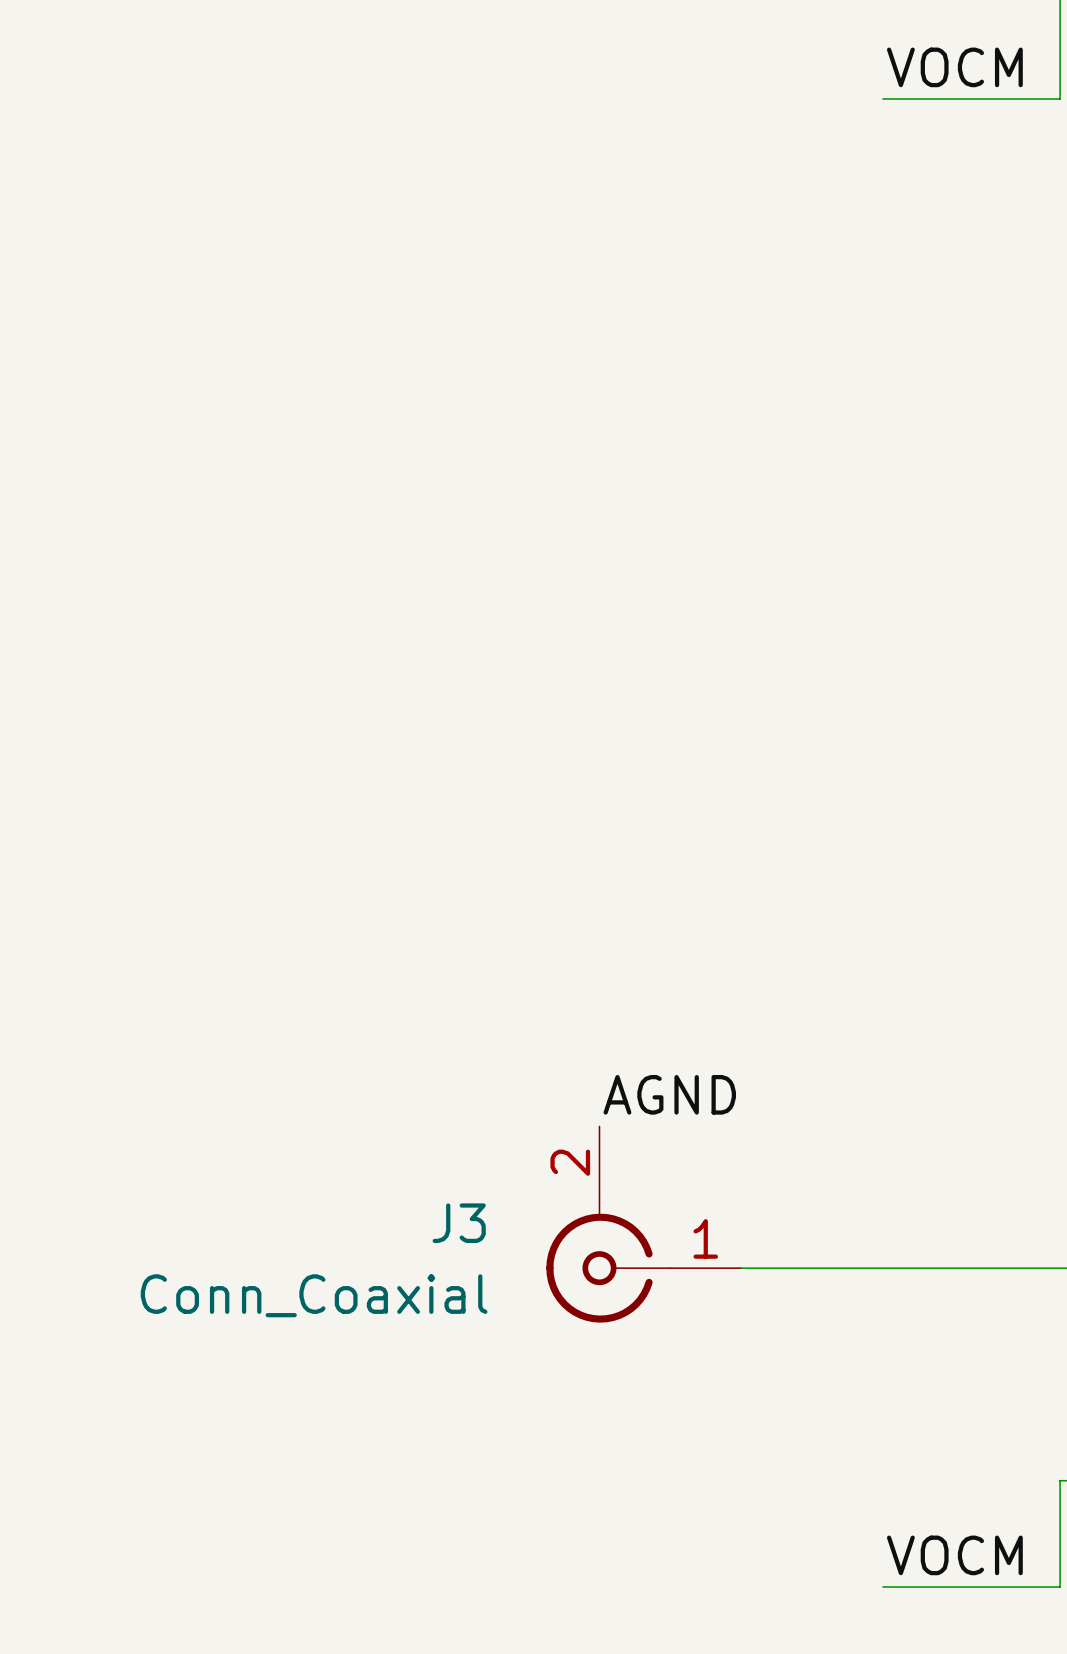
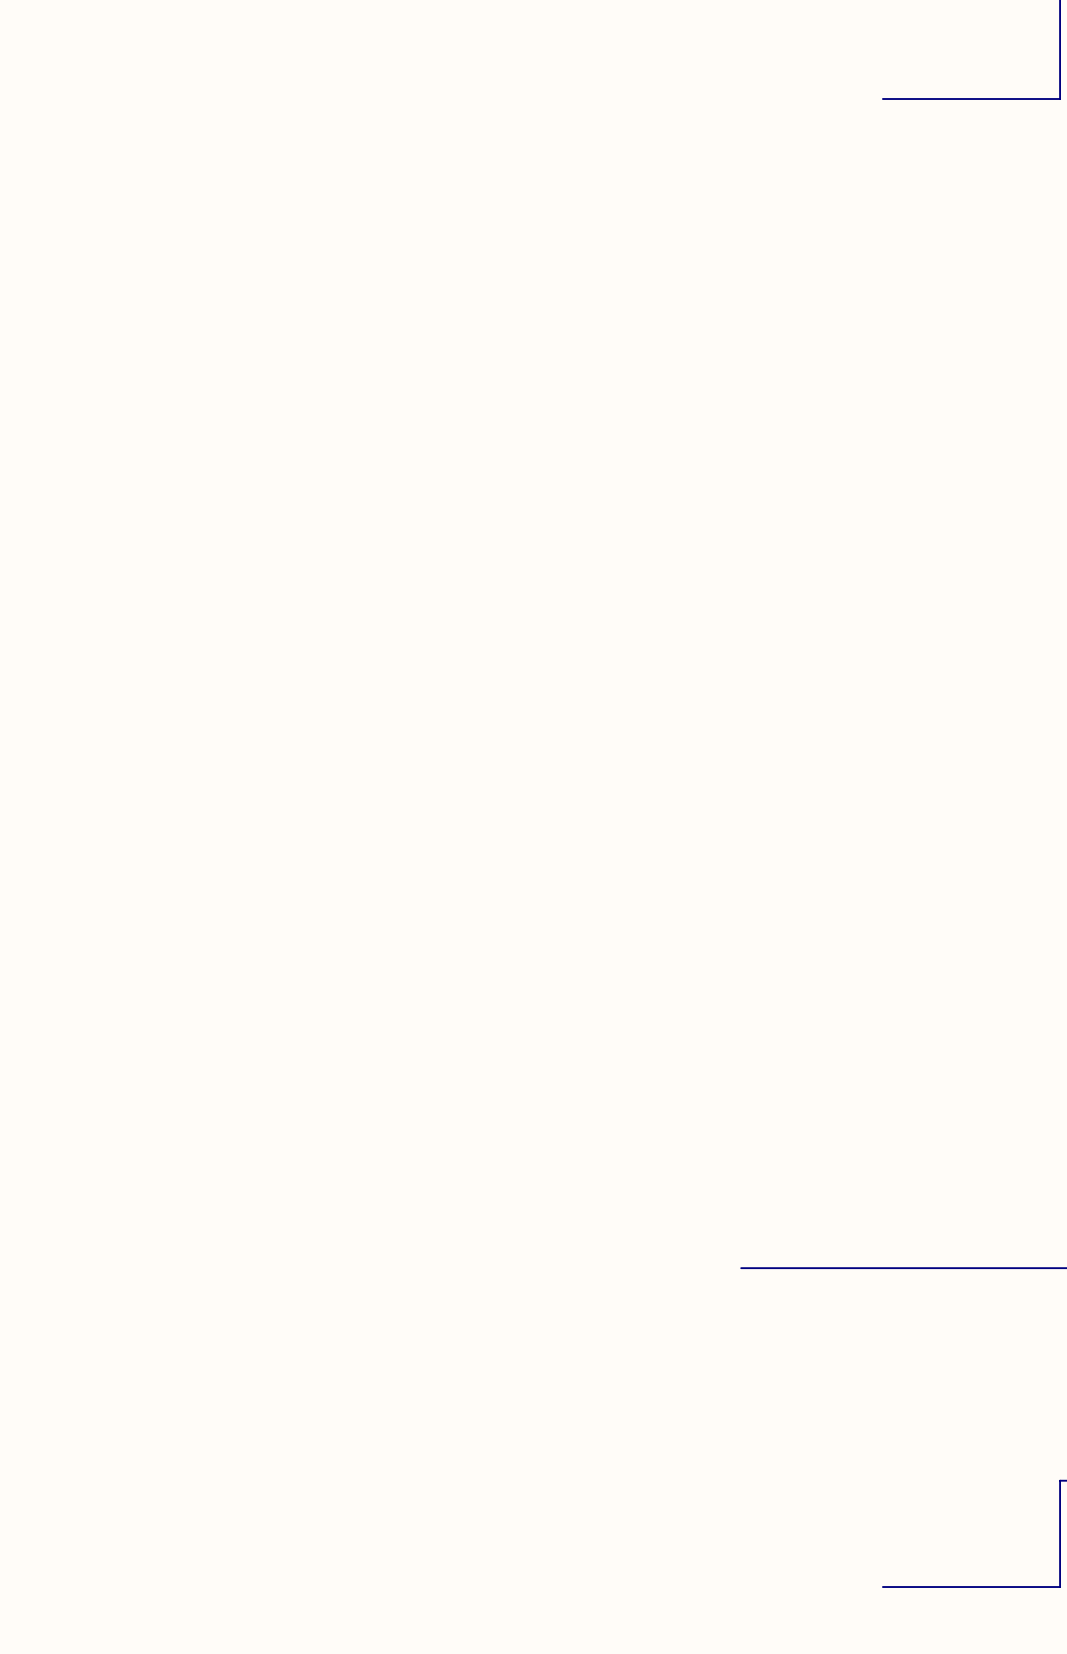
label: VOCM (954, 67) -> none
label: AGND (669, 1094) -> none
J3: Conn_Coaxial (643, 1224) -> none
label: VOCM (954, 1555) -> none

